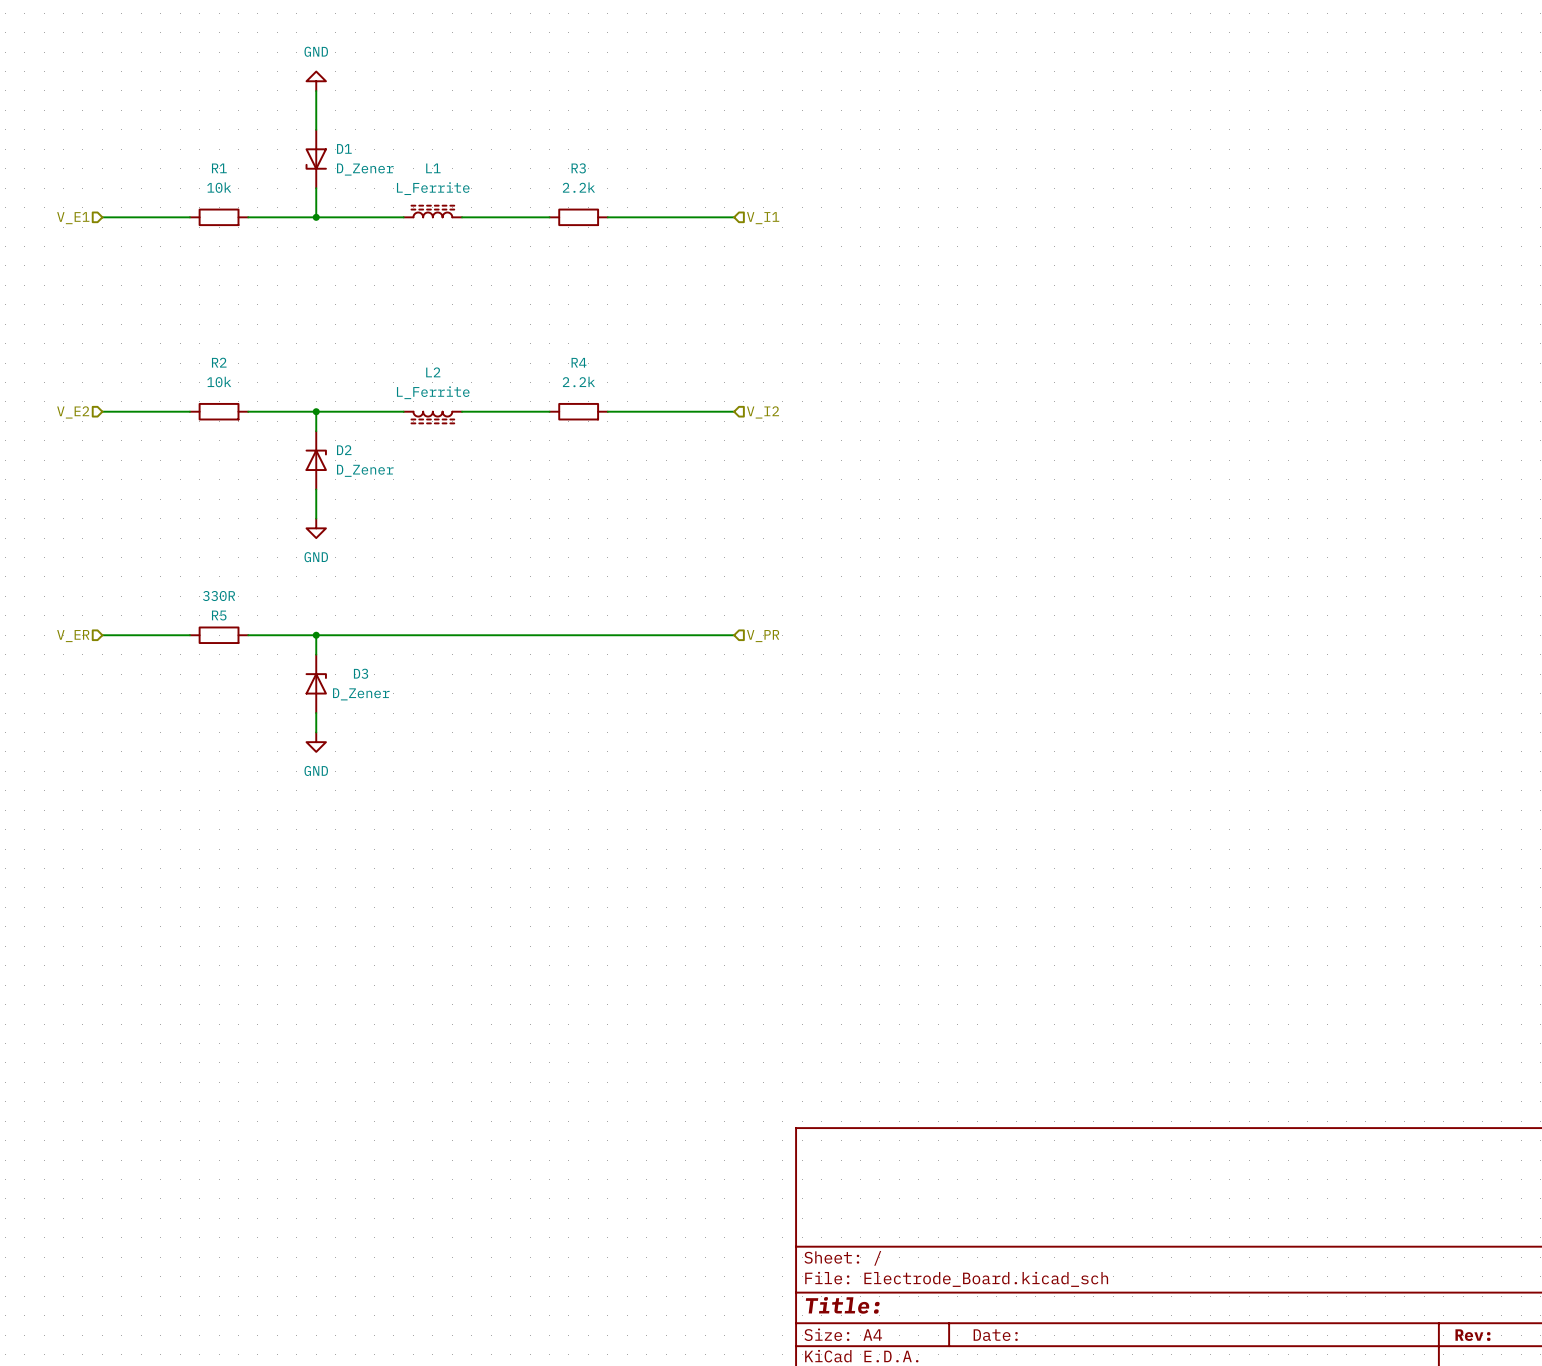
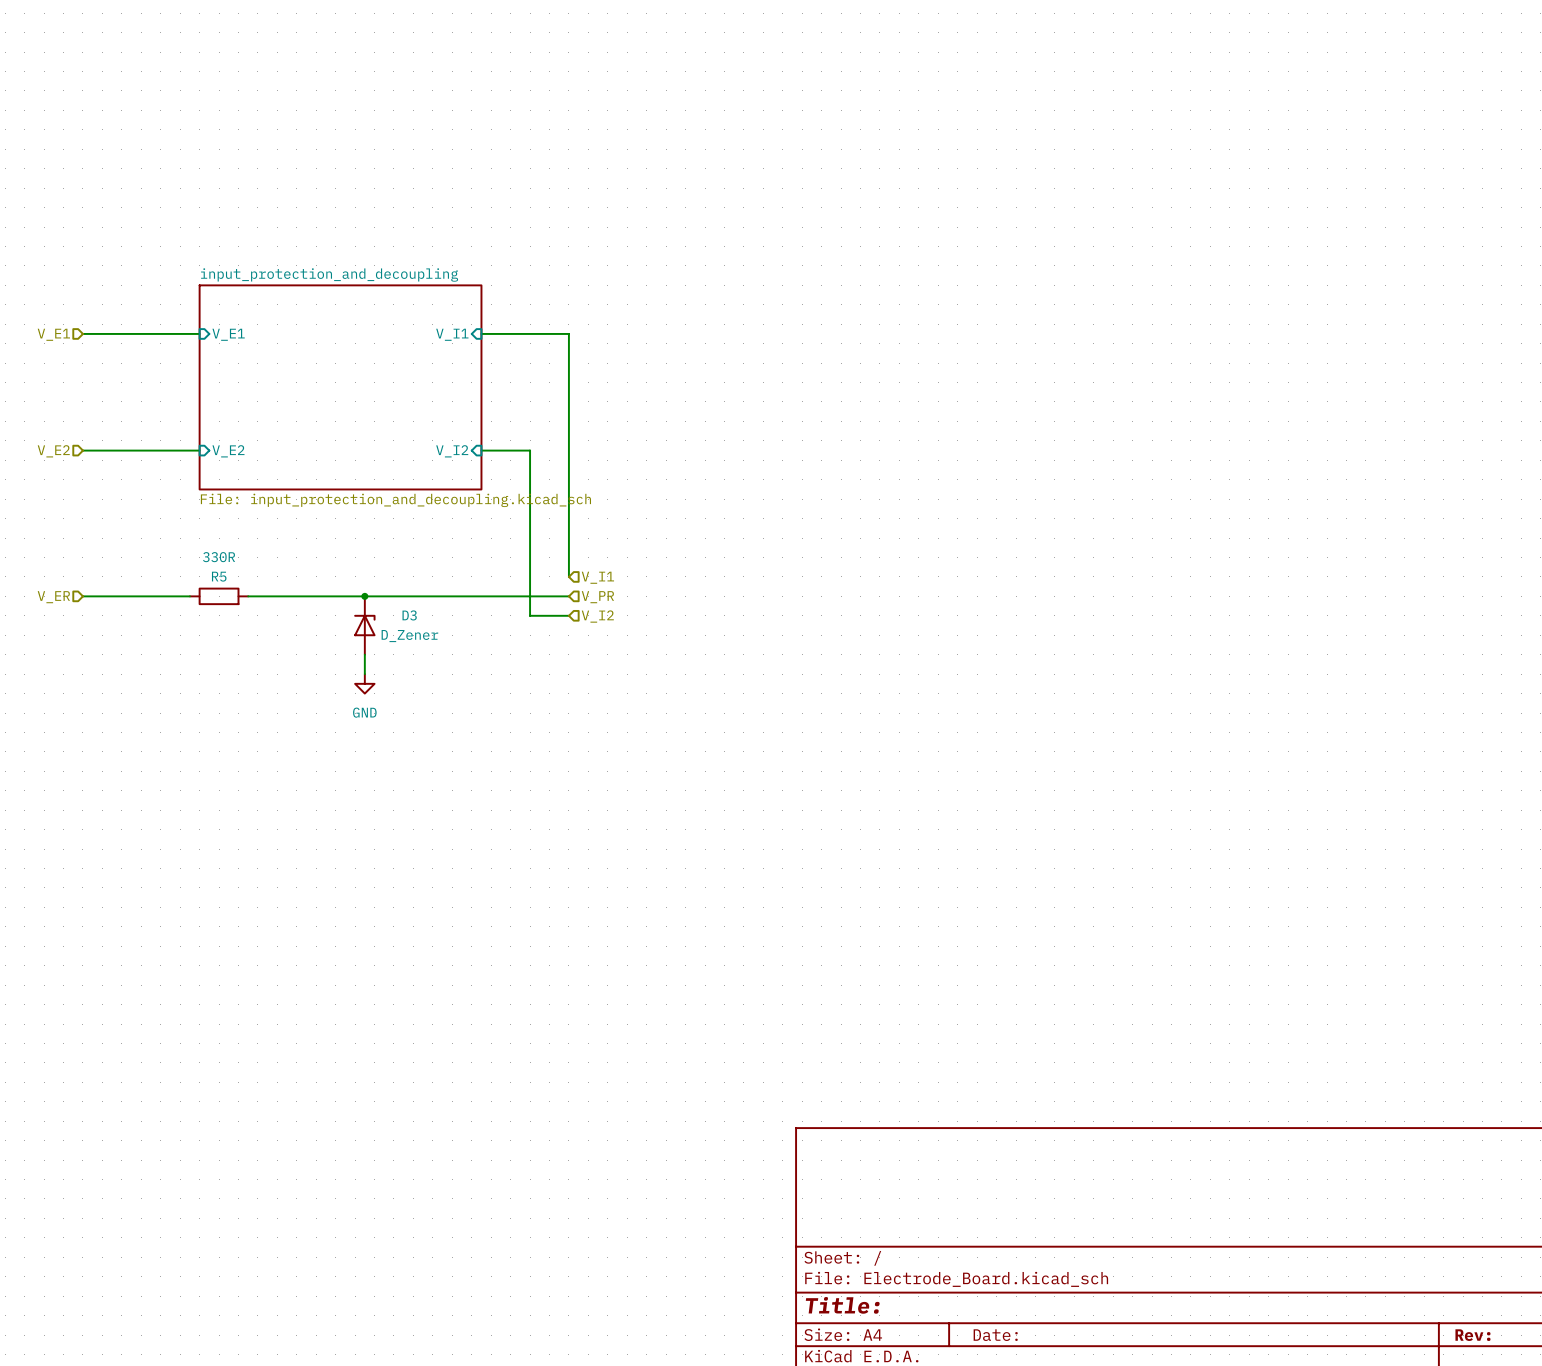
power symbol: GND (316, 81) -> none
wire: (316, 90) (316, 129) -> none
D1: D_Zener (316, 159) -> none
wire: (316, 188) (316, 217) -> none
L1: L_Ferrite (432, 211) -> none
wire: (102, 217) (189, 217) -> none
R1: 10k (219, 217) -> none
wire: (248, 217) (403, 217) -> none
junction: (316, 217) -> none
wire: (462, 217) (549, 217) -> none
R3: 2.2k (578, 217) -> none
wire: (607, 217) (734, 217) -> none
hierarchical label position: V_E1 (73, 218) -> V_E1 (53, 334)
hierarchical label: V_I1 (763, 218) -> none
wire: none -> (82, 333) (199, 333)
wire: none -> (481, 333) (568, 333) (568, 576)
sheet pin: none -> V_E1 (228, 334)
sheet pin: none -> V_I1 (452, 334)
sheet input_protection_and_decoupling: none -> File: input_protection_and_decoupling.kicad_sch (340, 387)
wire: (102, 411) (189, 411) -> none
R2: 10k (219, 411) -> none
wire: (248, 411) (403, 411) -> none
wire: (316, 411) (316, 431) -> none
junction: (316, 411) -> none
wire: (462, 411) (549, 411) -> none
R4: 2.2k (578, 411) -> none
wire: (607, 411) (734, 411) -> none
hierarchical label position: V_E2 (73, 412) -> V_E2 (53, 451)
hierarchical label: V_I2 (763, 412) -> none
L2: L_Ferrite (432, 417) -> none
wire: none -> (82, 450) (199, 450)
wire: none -> (481, 450) (530, 450) (530, 615) (568, 615)
sheet pin: none -> V_E2 (228, 451)
sheet pin: none -> V_I2 (452, 451)
D2: D_Zener (316, 460) -> none
wire: (316, 489) (316, 518) -> none
power symbol: GND (316, 528) -> none
hierarchical label: none -> V_I1 (597, 577)
wire: none -> (82, 596) (189, 596)
wire: none -> (248, 596) (568, 596)
junction: none -> (364, 596)
hierarchical label: none -> V_I2 (597, 616)
wire: (102, 635) (189, 635) -> none
R5 position: (219, 635) -> (219, 596)
wire: (248, 635) (734, 635) -> none
wire: (316, 635) (316, 654) -> (364, 654) (364, 674)
junction: (316, 635) -> none
hierarchical label position: V_ER (73, 636) -> V_ER (53, 597)
hierarchical label position: V_PR (763, 636) -> V_PR (597, 597)
D3 position: (316, 683) -> (364, 625)
wire: (316, 713) (316, 732) -> none
power symbol position: GND (316, 742) -> GND (364, 683)

